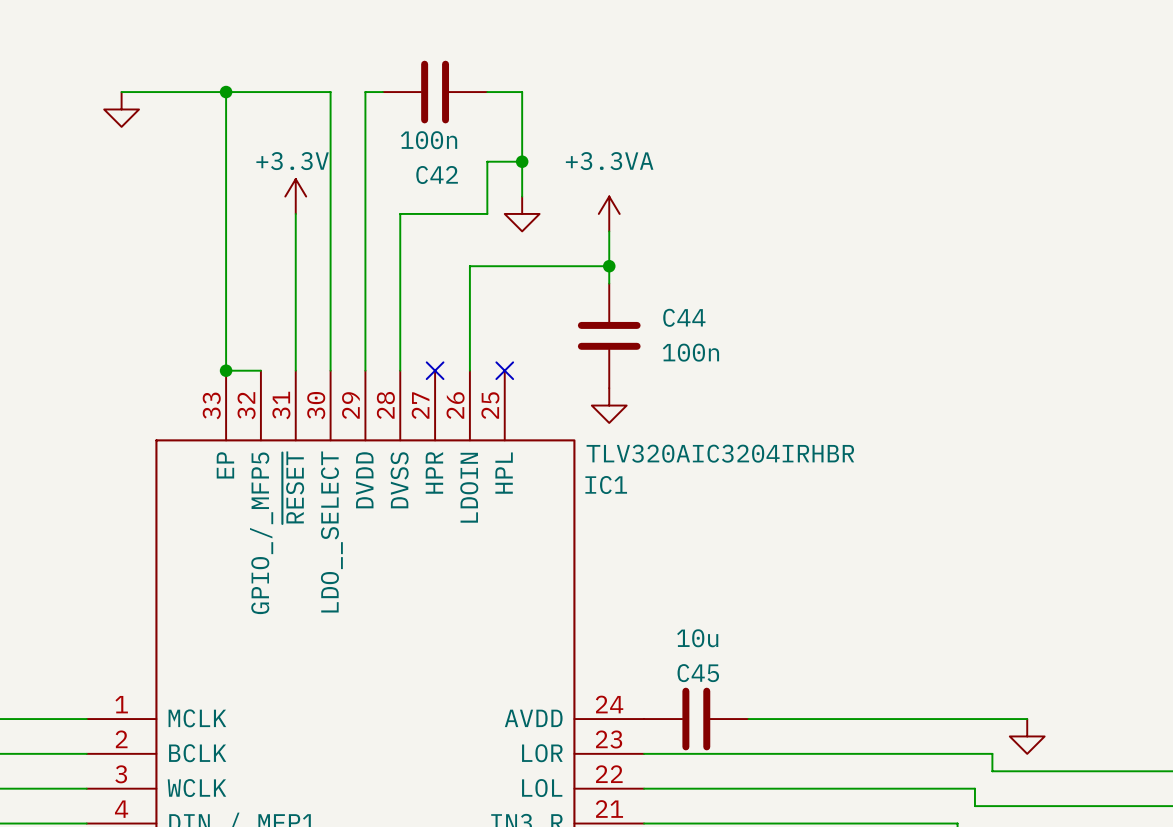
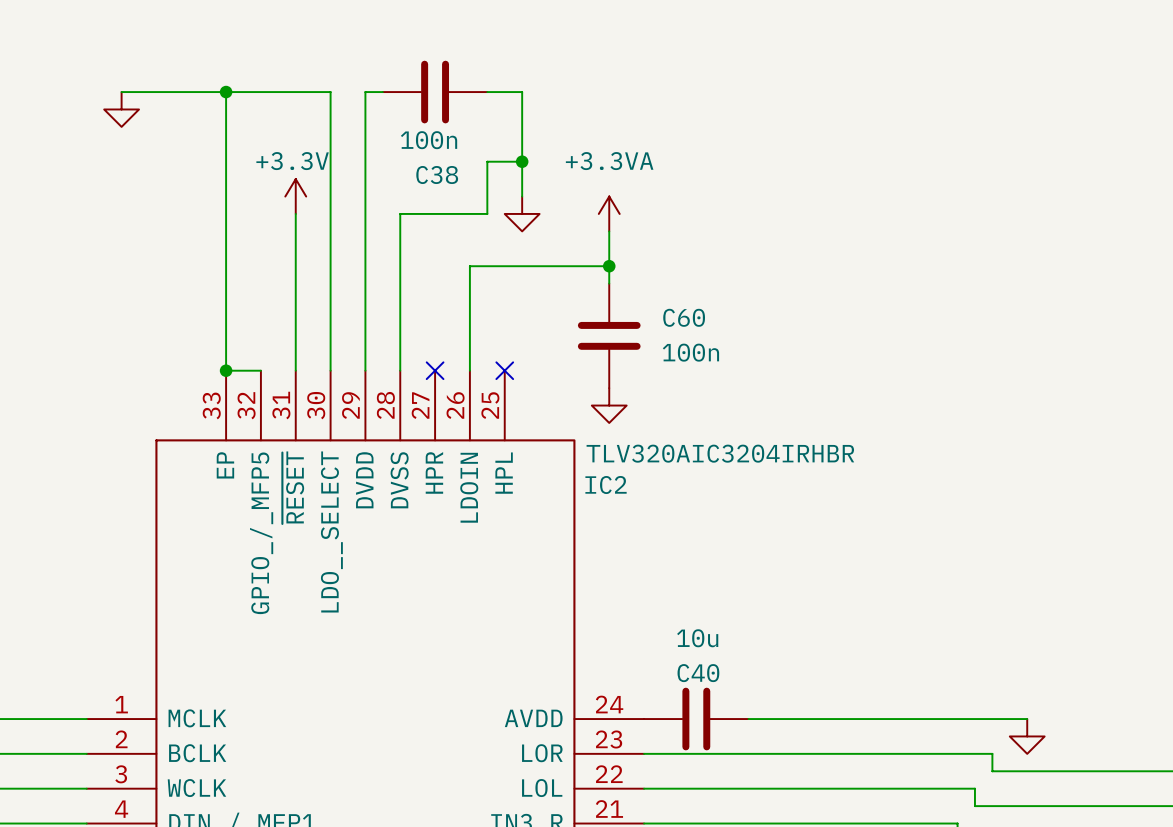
C42 name: C42 (437, 175) -> C38 (437, 175)
C44 name: C44 (684, 317) -> C60 (684, 317)
IC1 name: IC1 (606, 485) -> IC2 (606, 485)
C45 name: C45 (698, 673) -> C40 (698, 673)

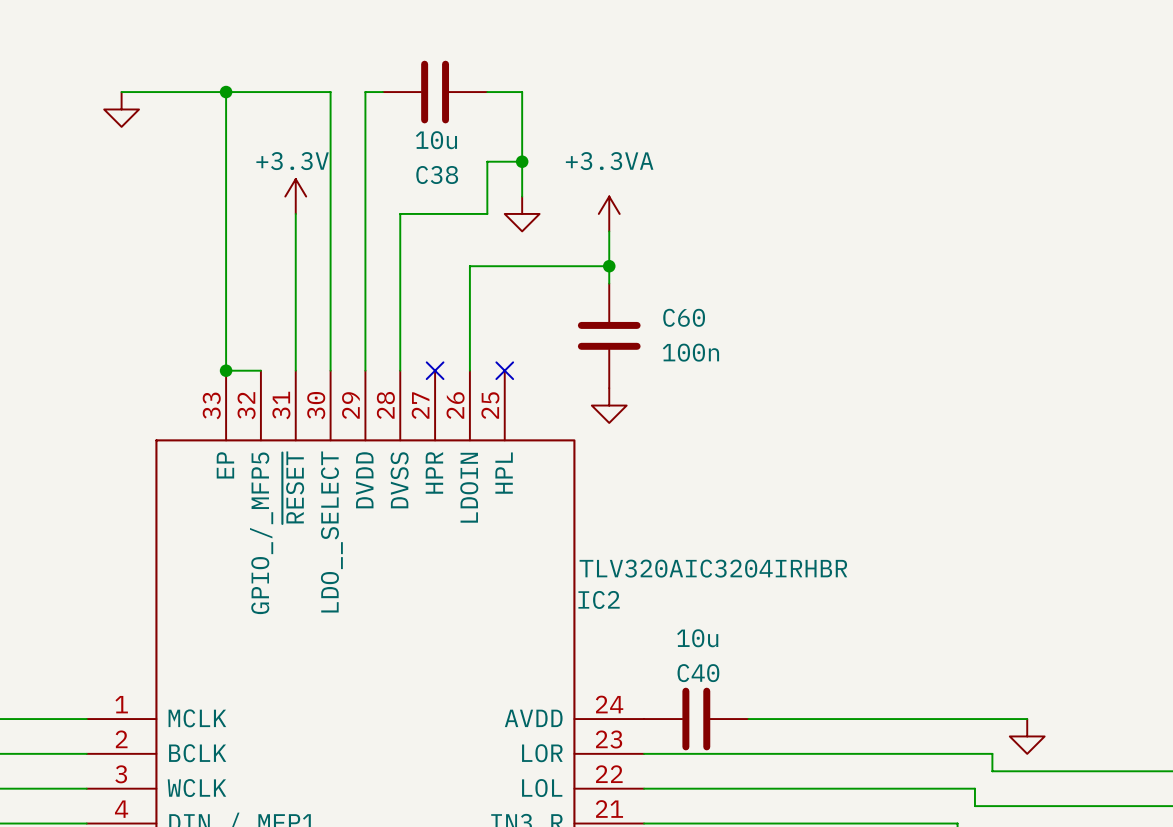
C38 value: 100n (429, 140) -> 10u (436, 140)
IC2 value position: TLV320AIC3204IRHBR (720, 453) -> TLV320AIC3204IRHBR (713, 568)
IC2 name position: IC2 (606, 485) -> IC2 (599, 599)

